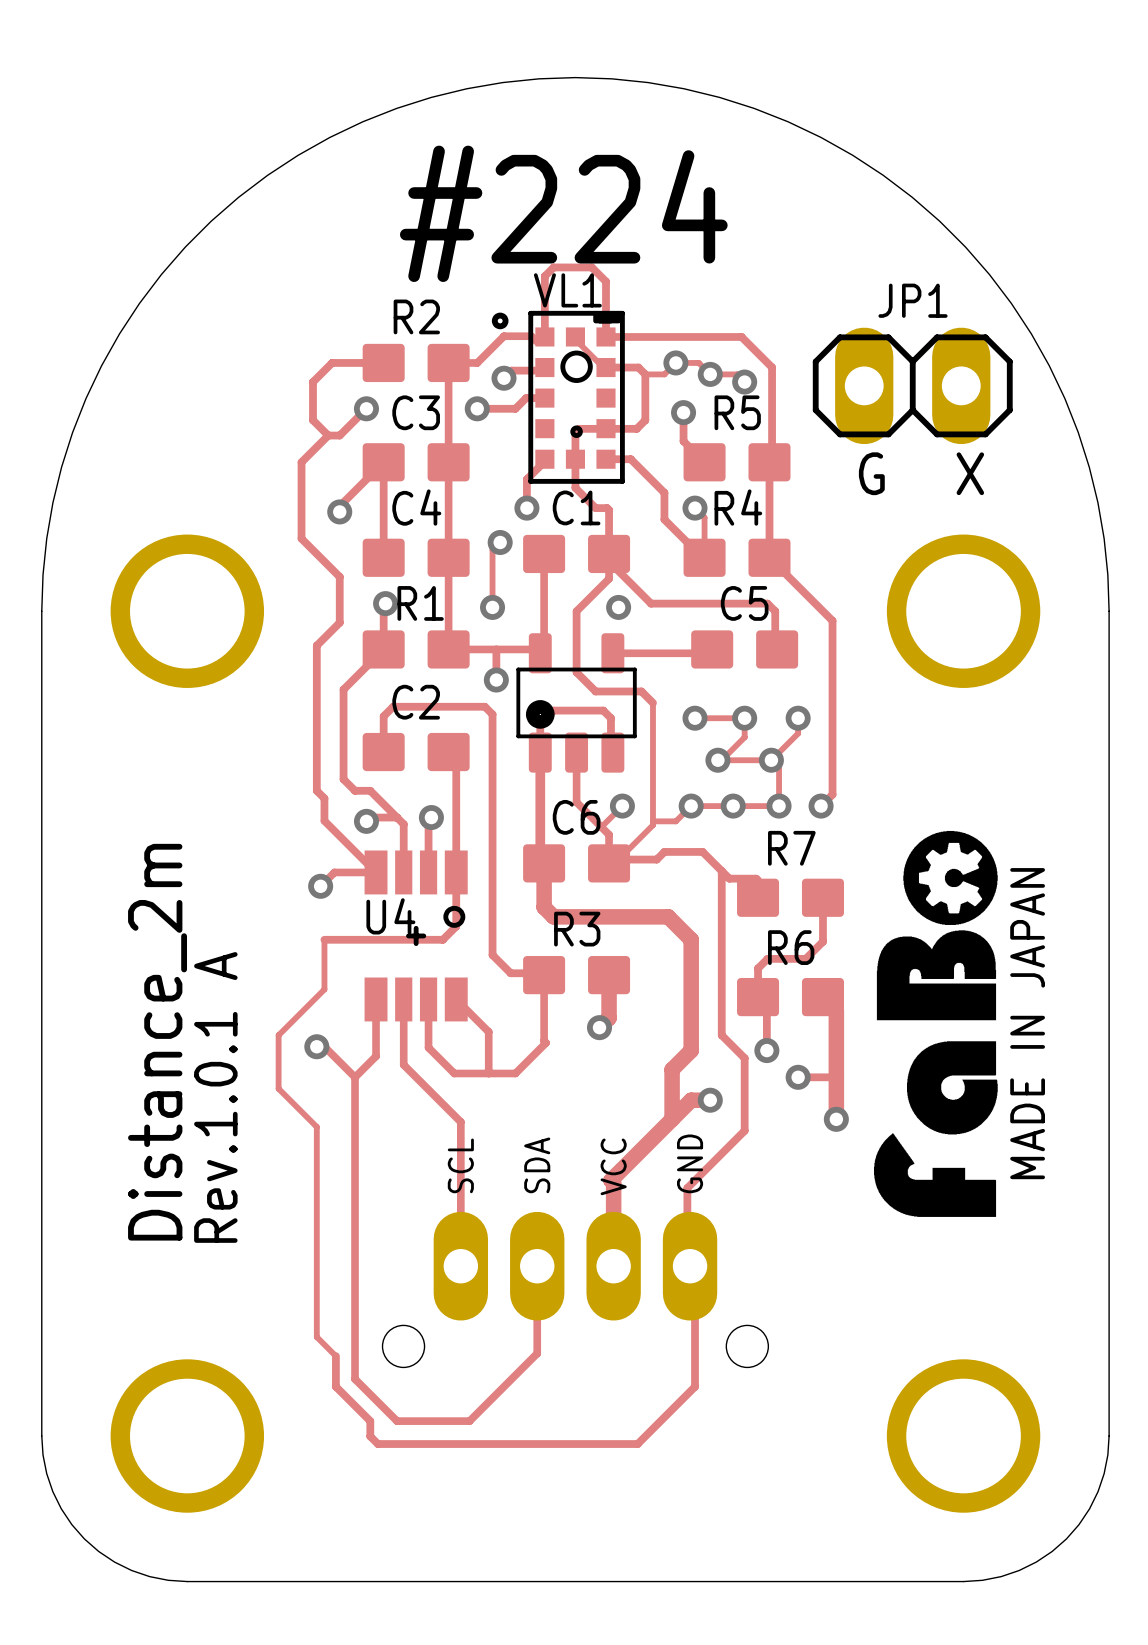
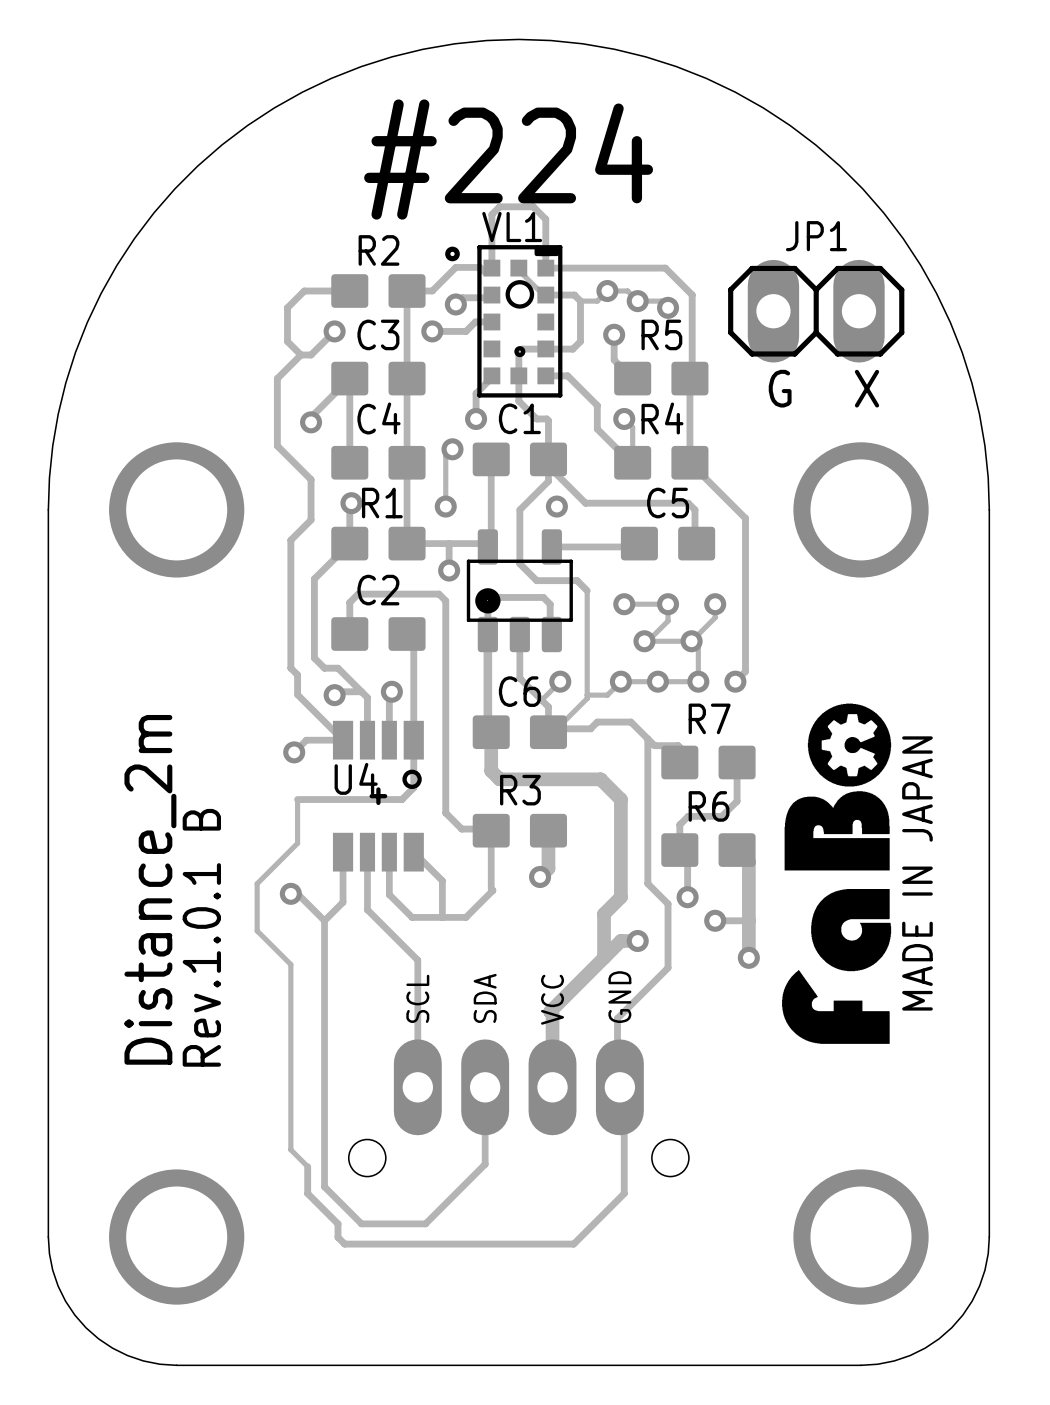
text: Rev.1.0.1 A (215, 1097) -> Rev.1.0.1 B (201, 937)

